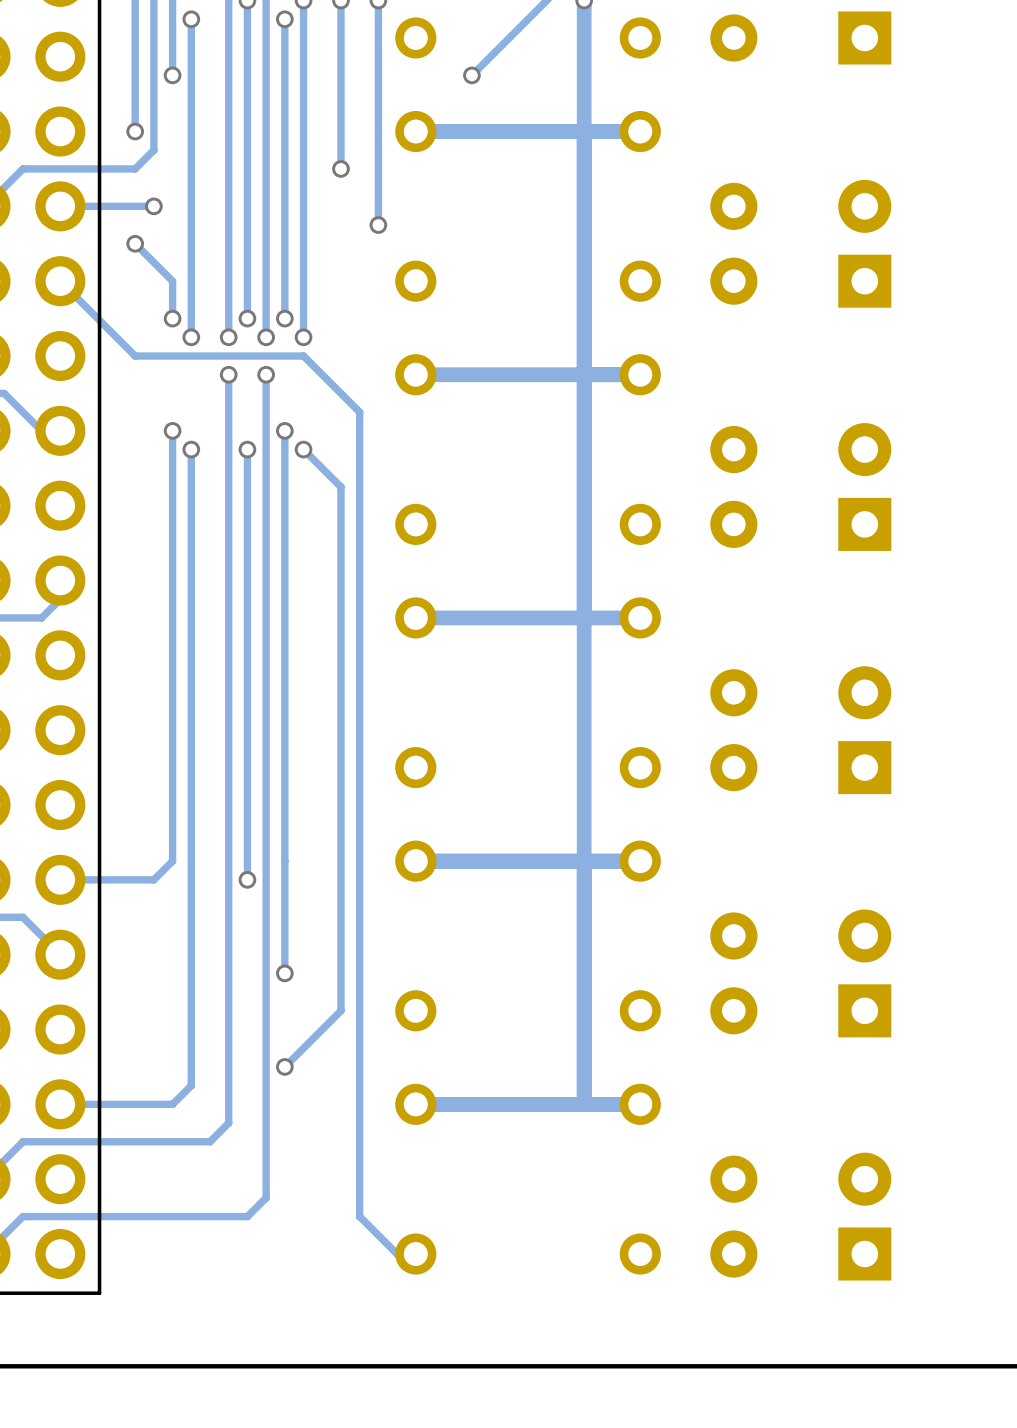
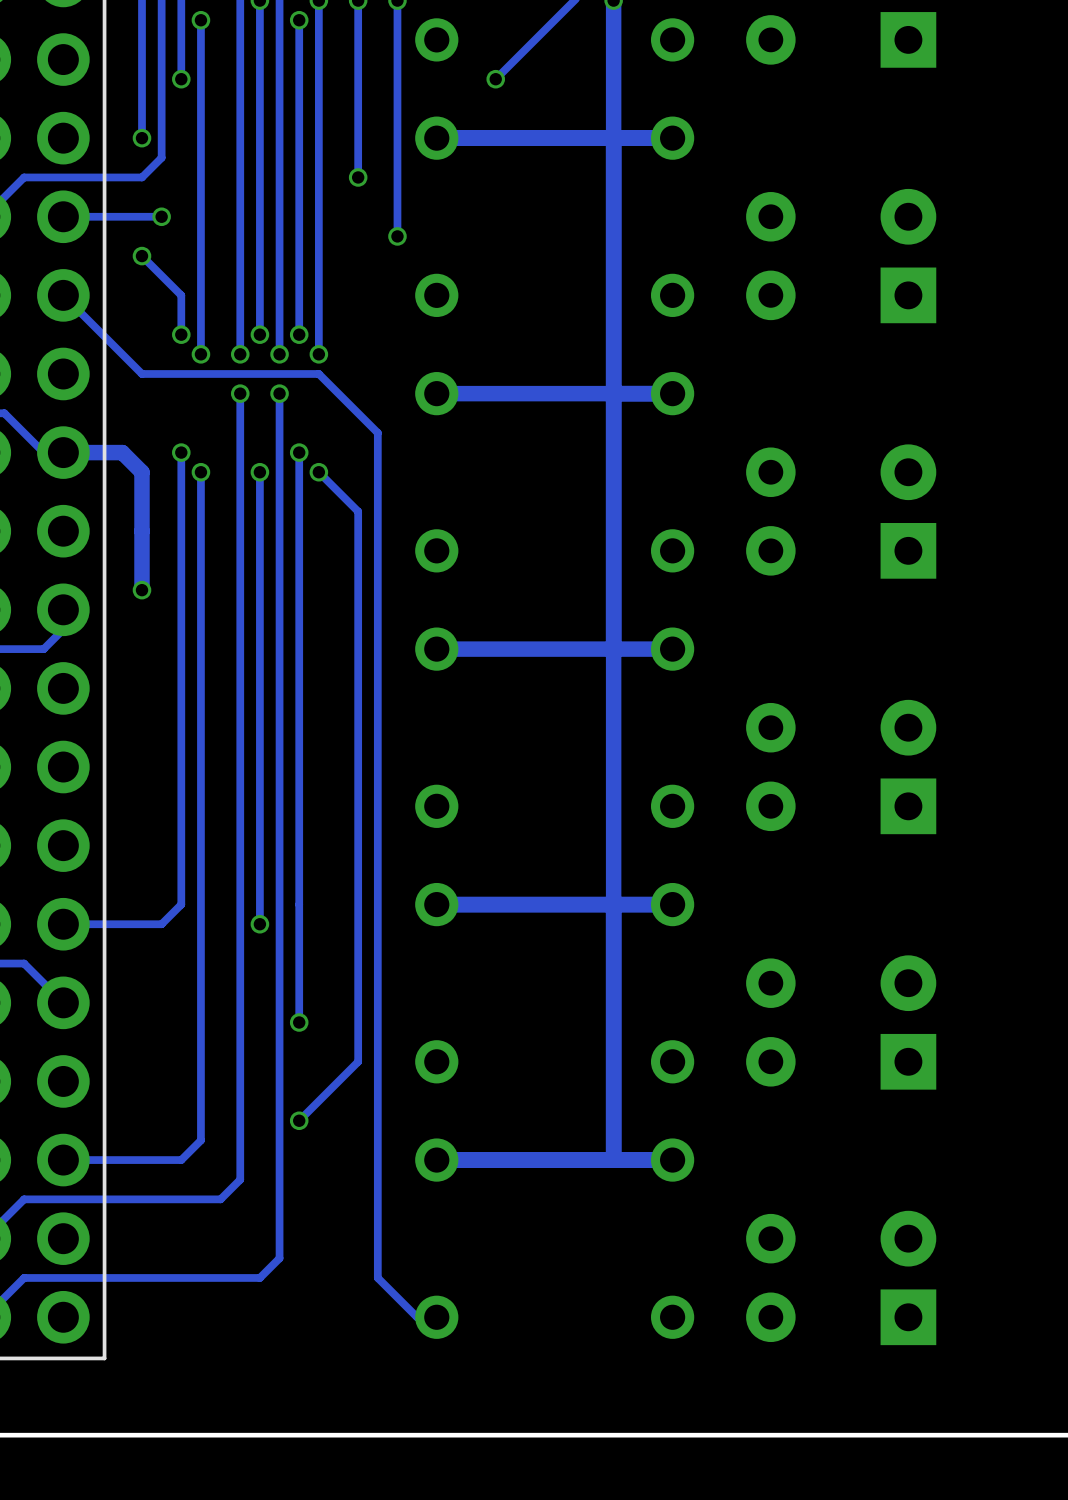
track: none -> (63, 452) (122, 452) (141, 472) (141, 590)
via: none -> (141, 590)

